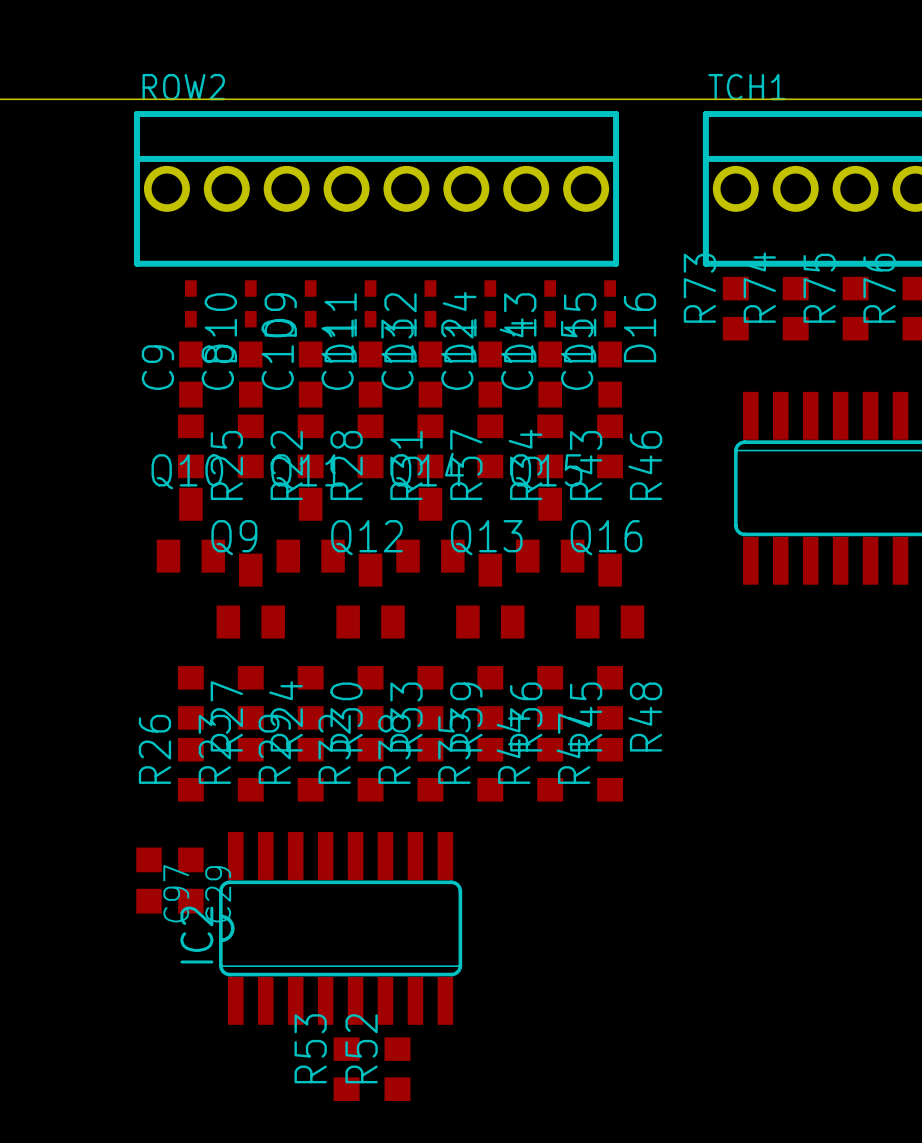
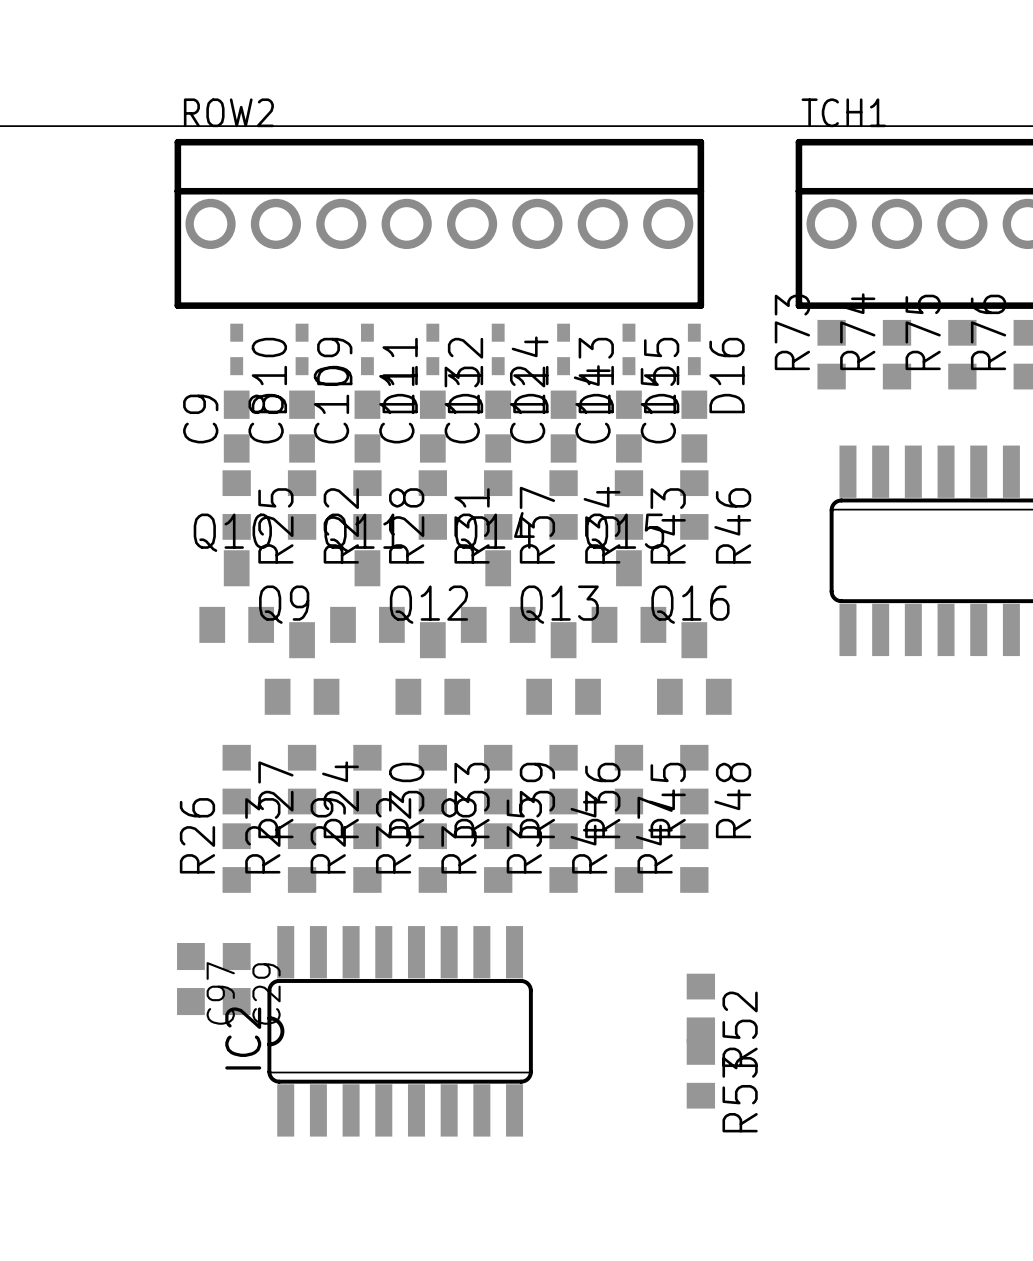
R53 name position: R53 (310, 1048) -> R53 (740, 1094)
R52 name position: R52 (361, 1048) -> R52 (740, 1029)
R53 position: (346, 1069) -> (700, 1073)
R52 position: (397, 1069) -> (700, 1008)

